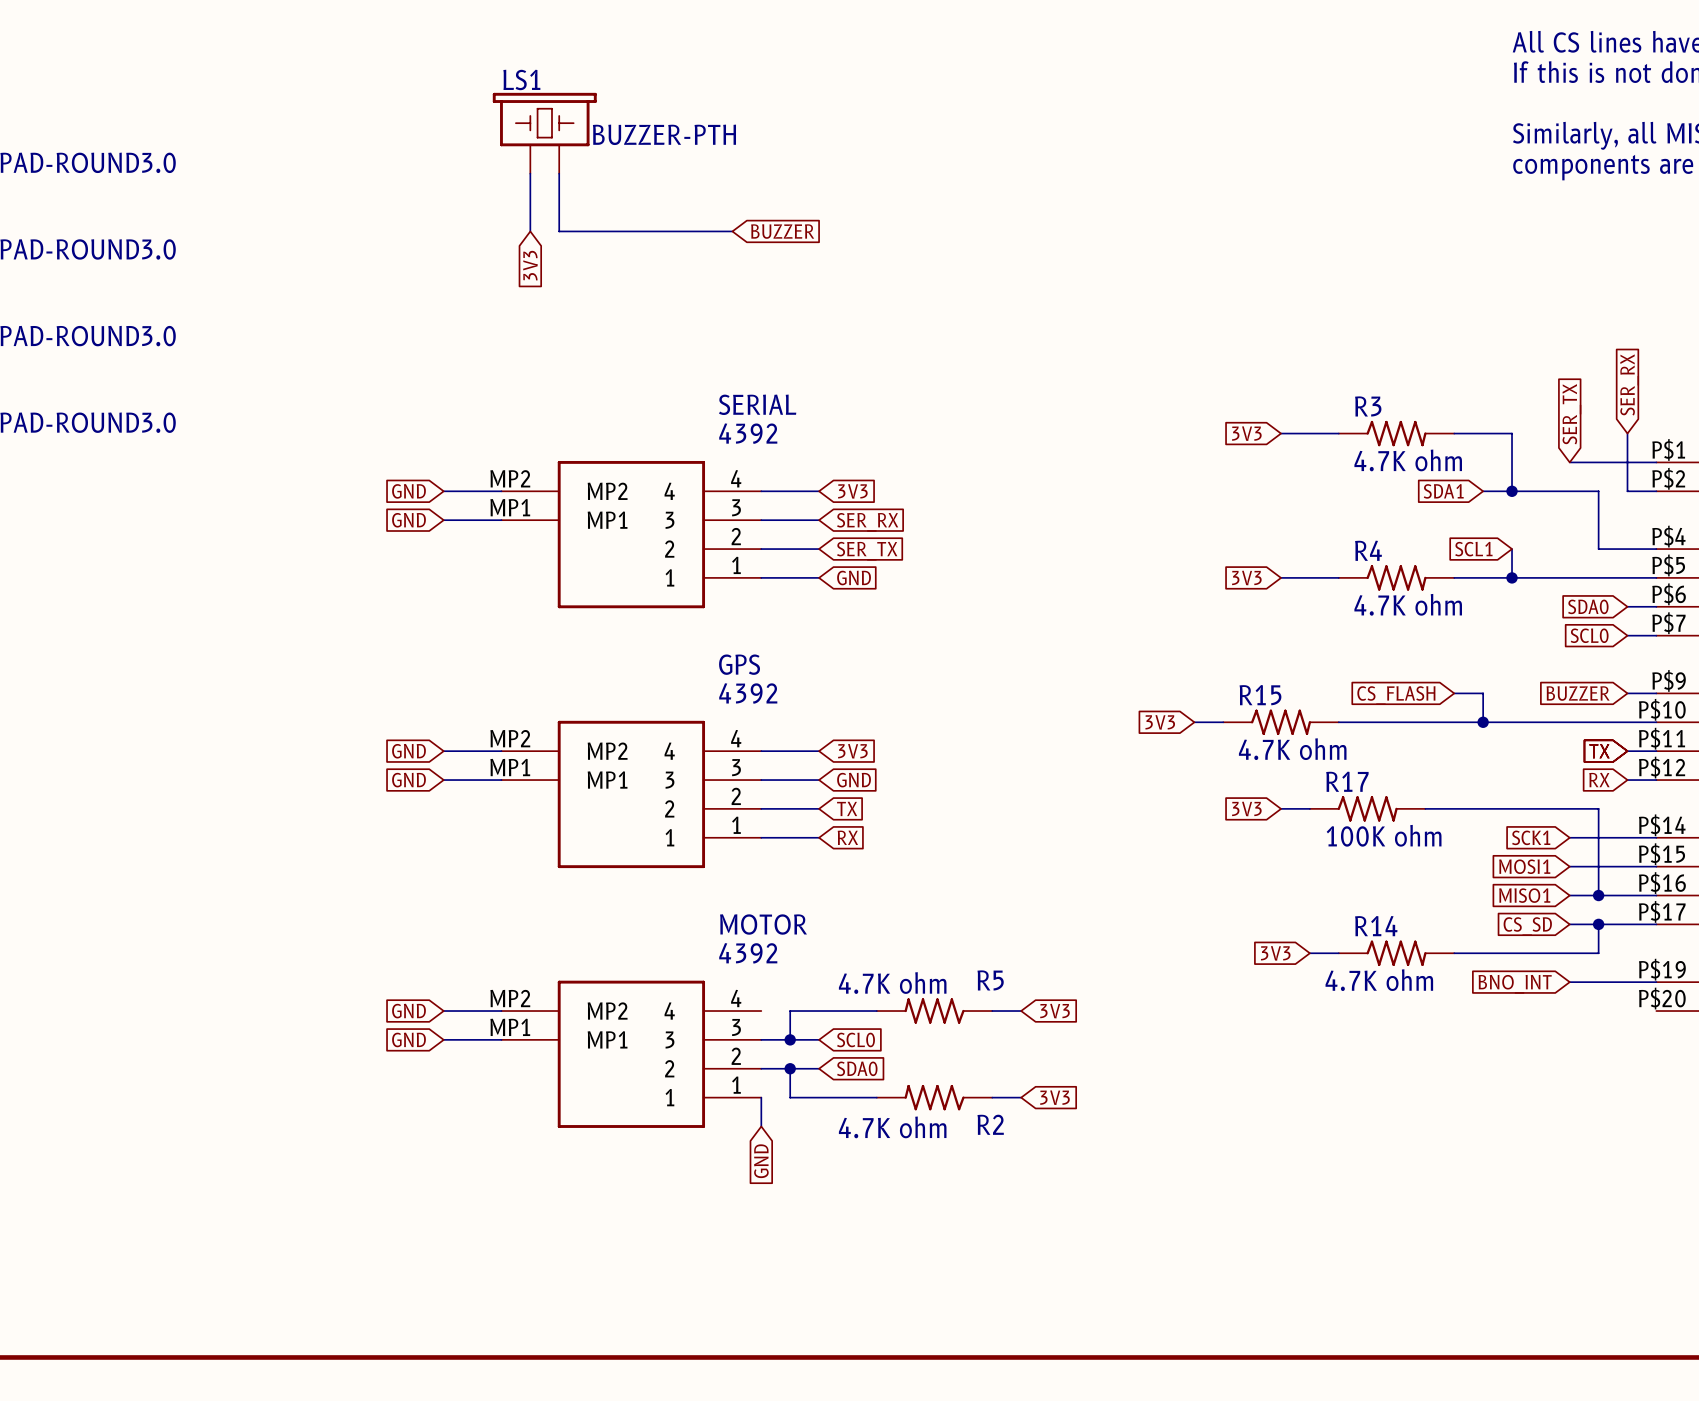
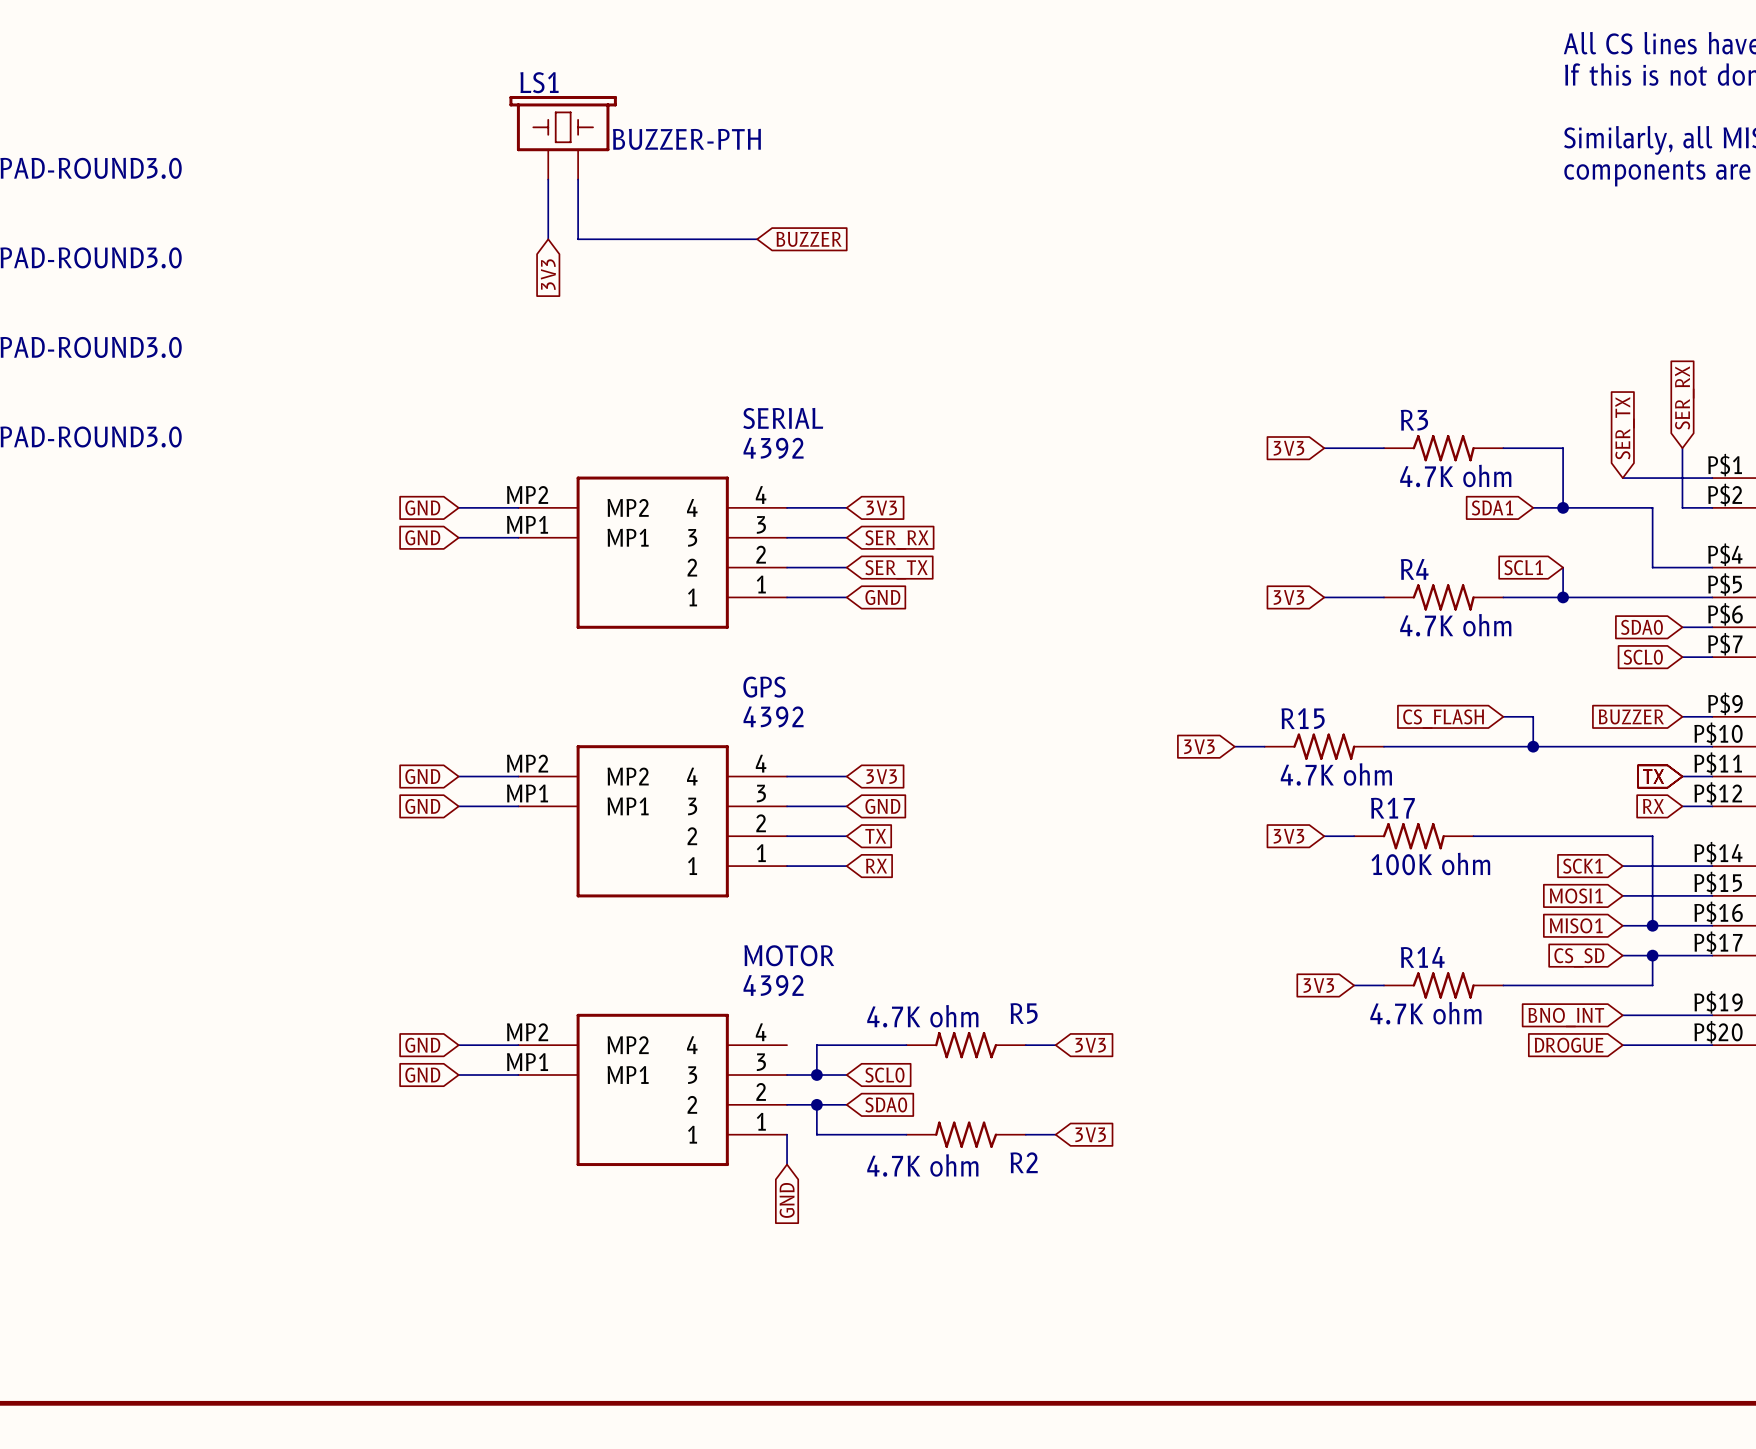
global label: none -> DROGUE (1569, 1045)
wire: none -> (1622, 1045) (1712, 1045)

